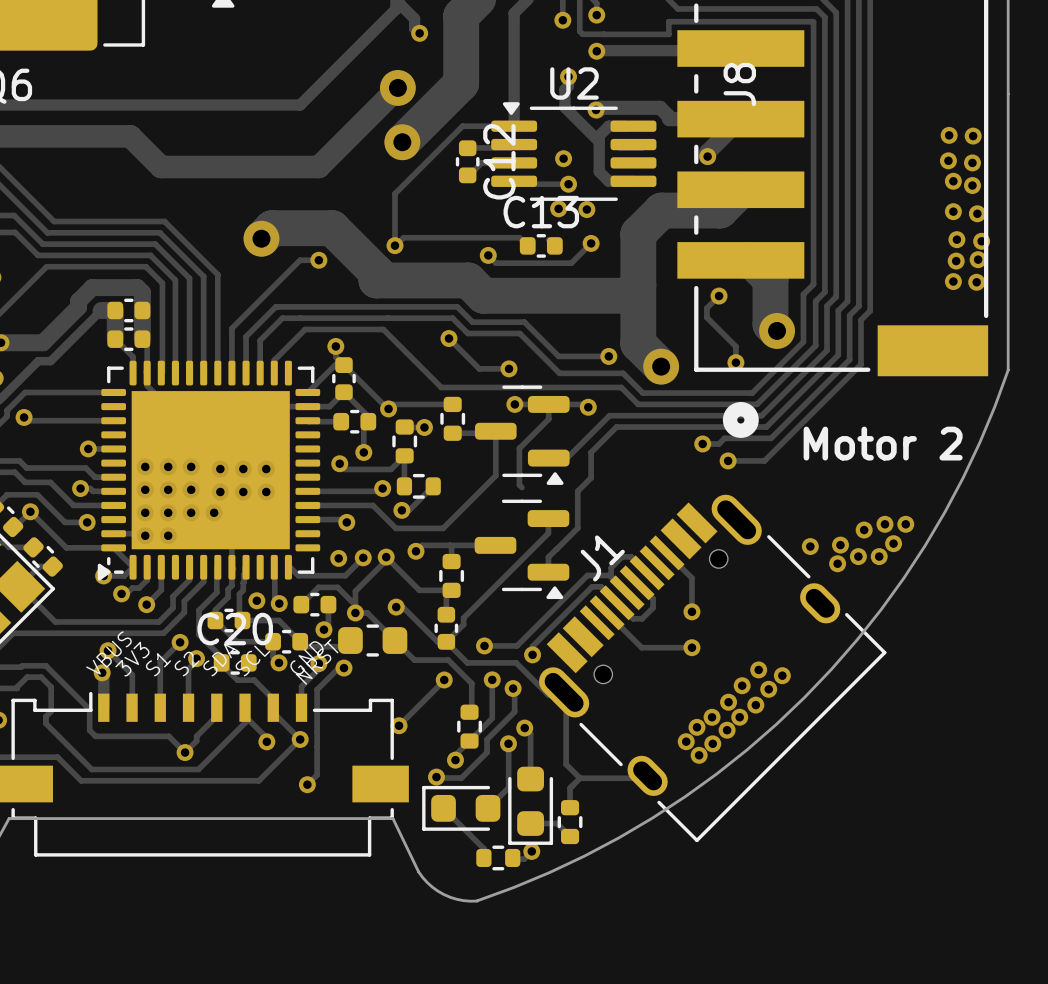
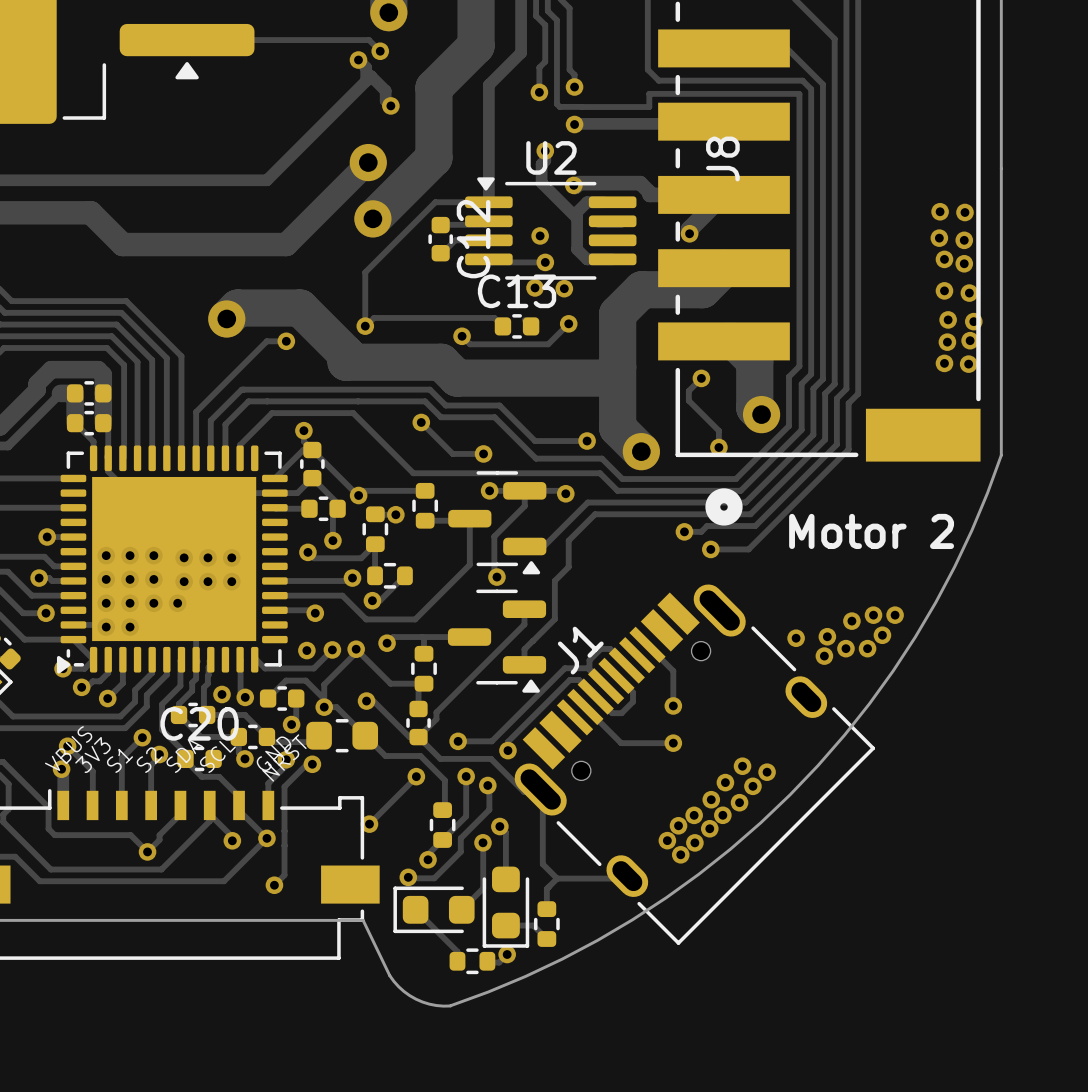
via: none -> (496, 577)

